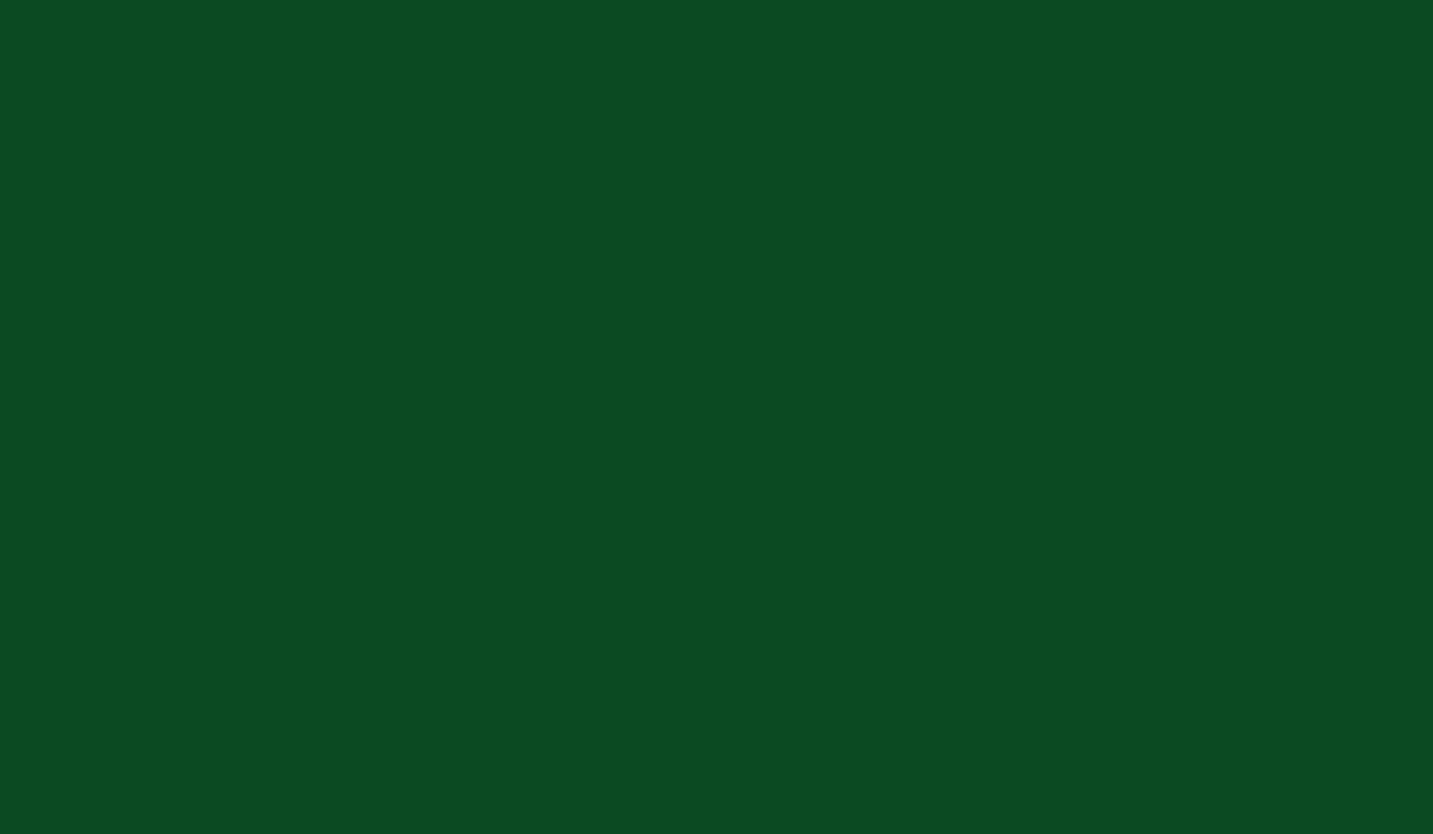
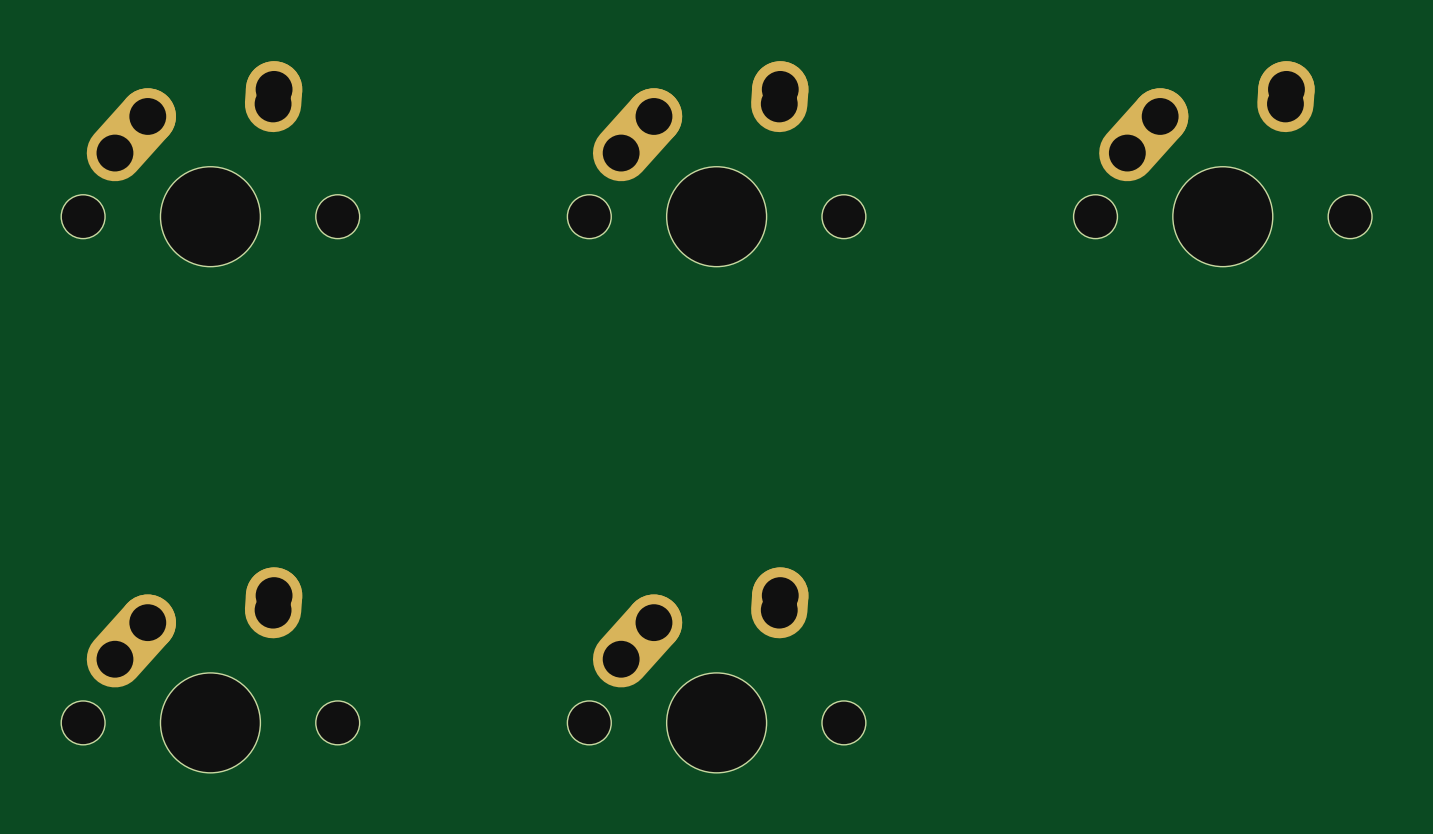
part: none -> (210, 163)
part: none -> (716, 163)
part: none -> (1222, 163)
part: none -> (210, 670)
part: none -> (716, 670)

